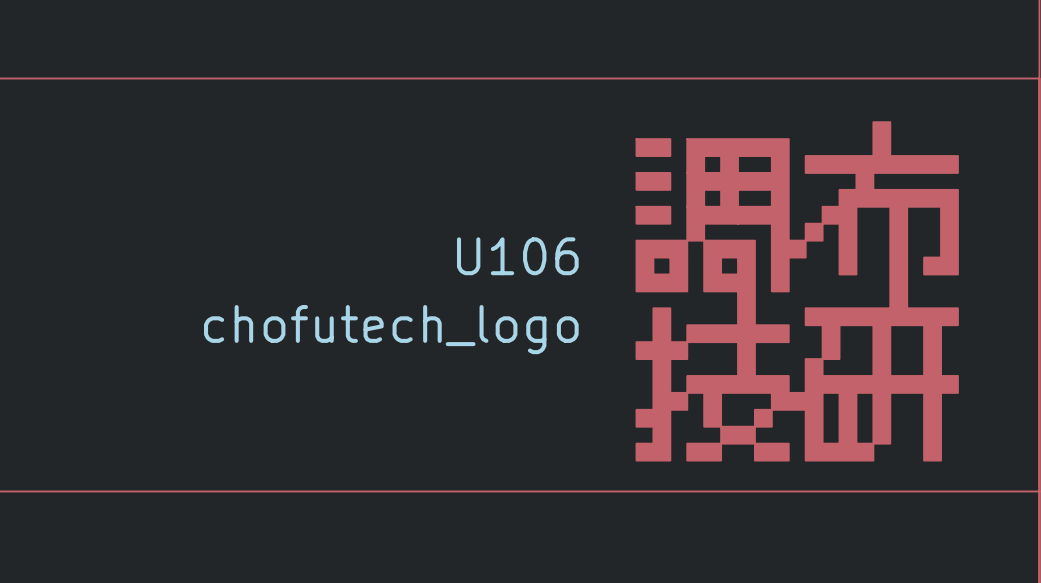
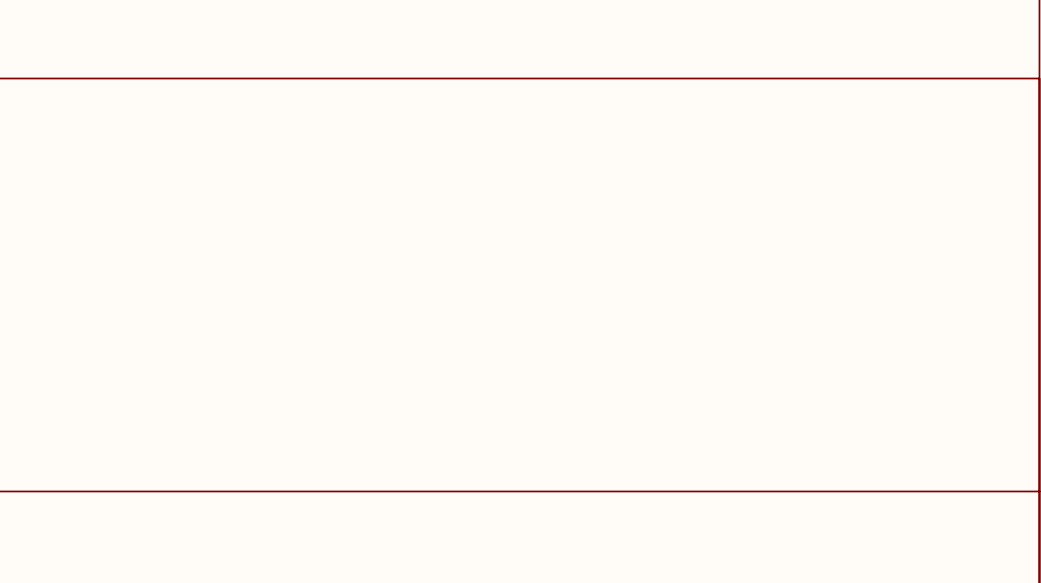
U106: chofutech_logo (797, 291) -> none

